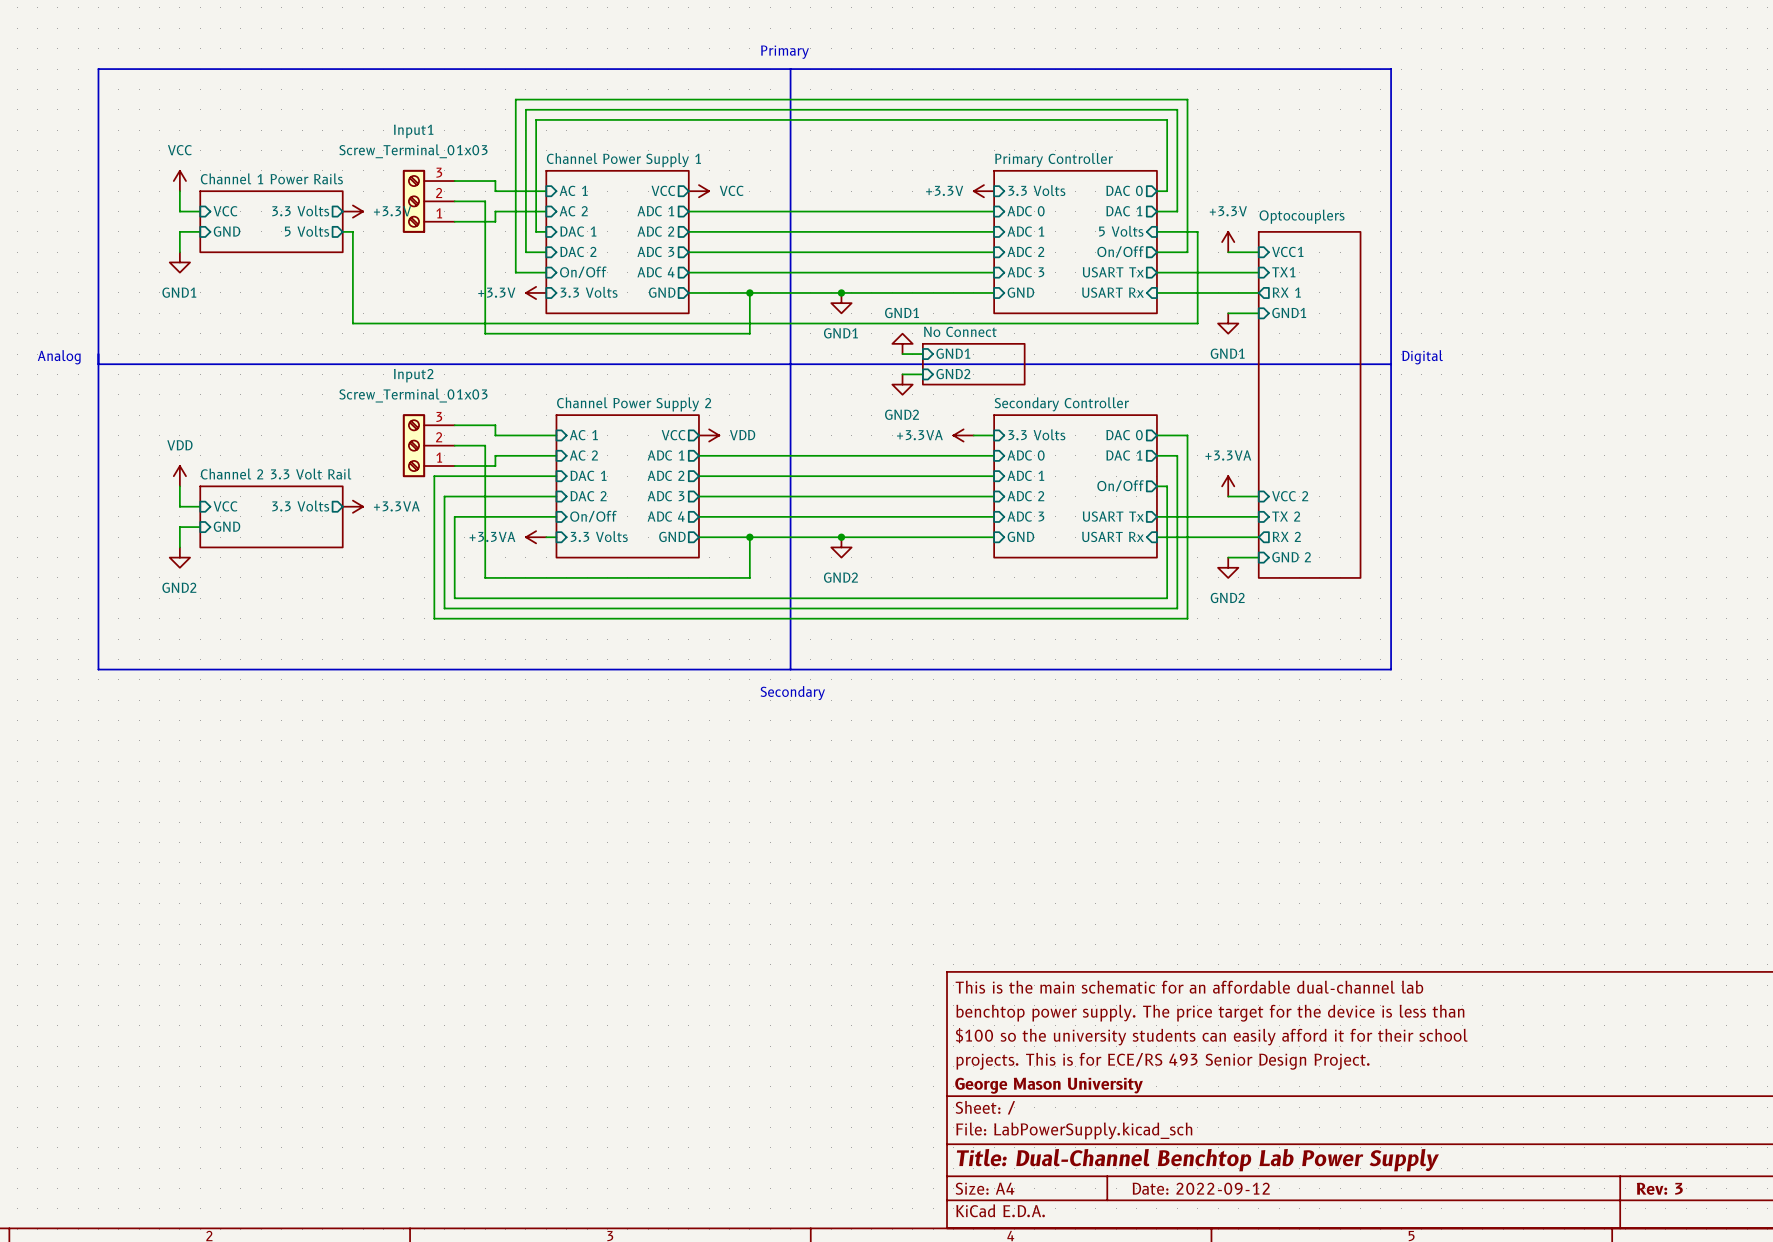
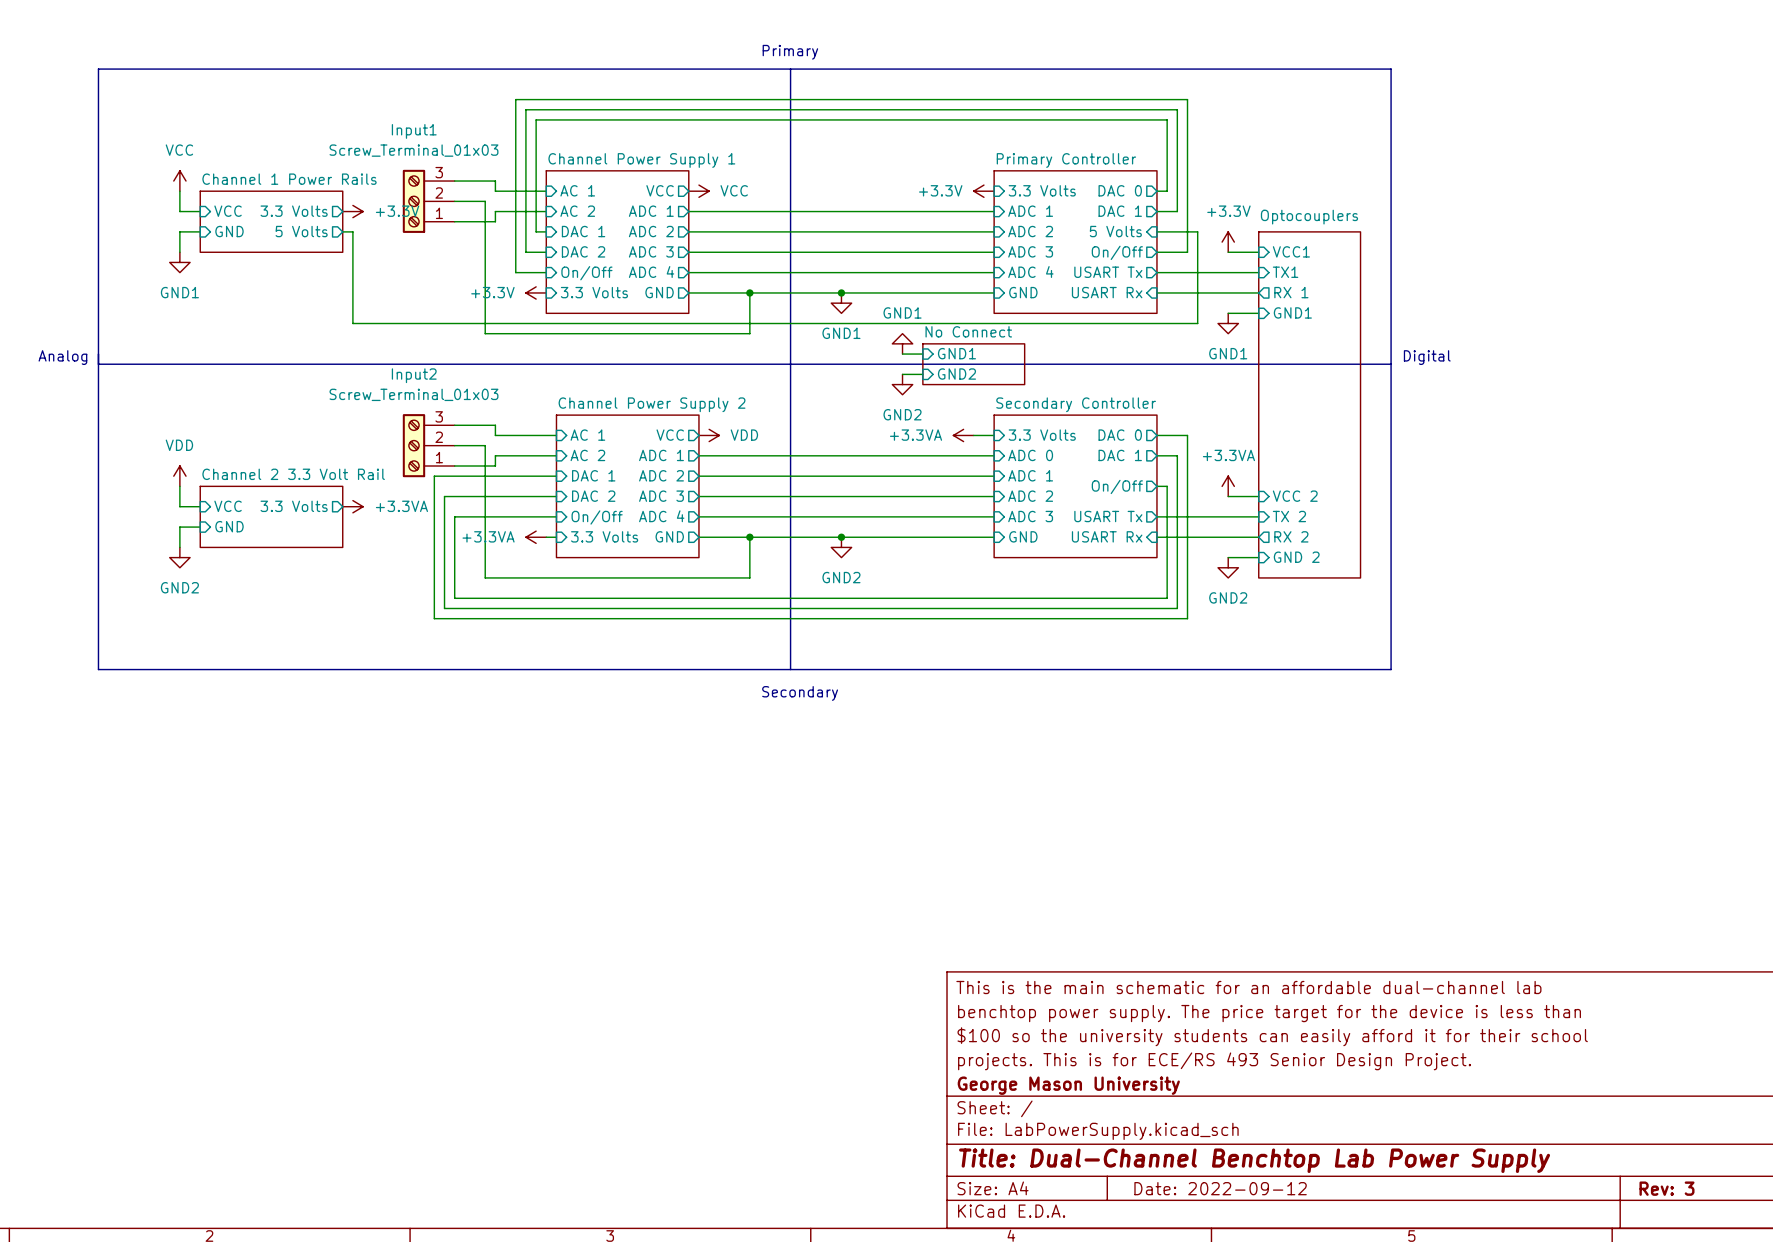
sheet pin: ADC 0 (1026, 211) -> ADC 1 (1030, 211)
sheet pin: ADC 1 (1025, 231) -> ADC 2 (1030, 231)
sheet pin: ADC 2 (1025, 251) -> ADC 3 (1030, 251)
sheet pin: ADC 3 (1025, 272) -> ADC 4 (1030, 272)

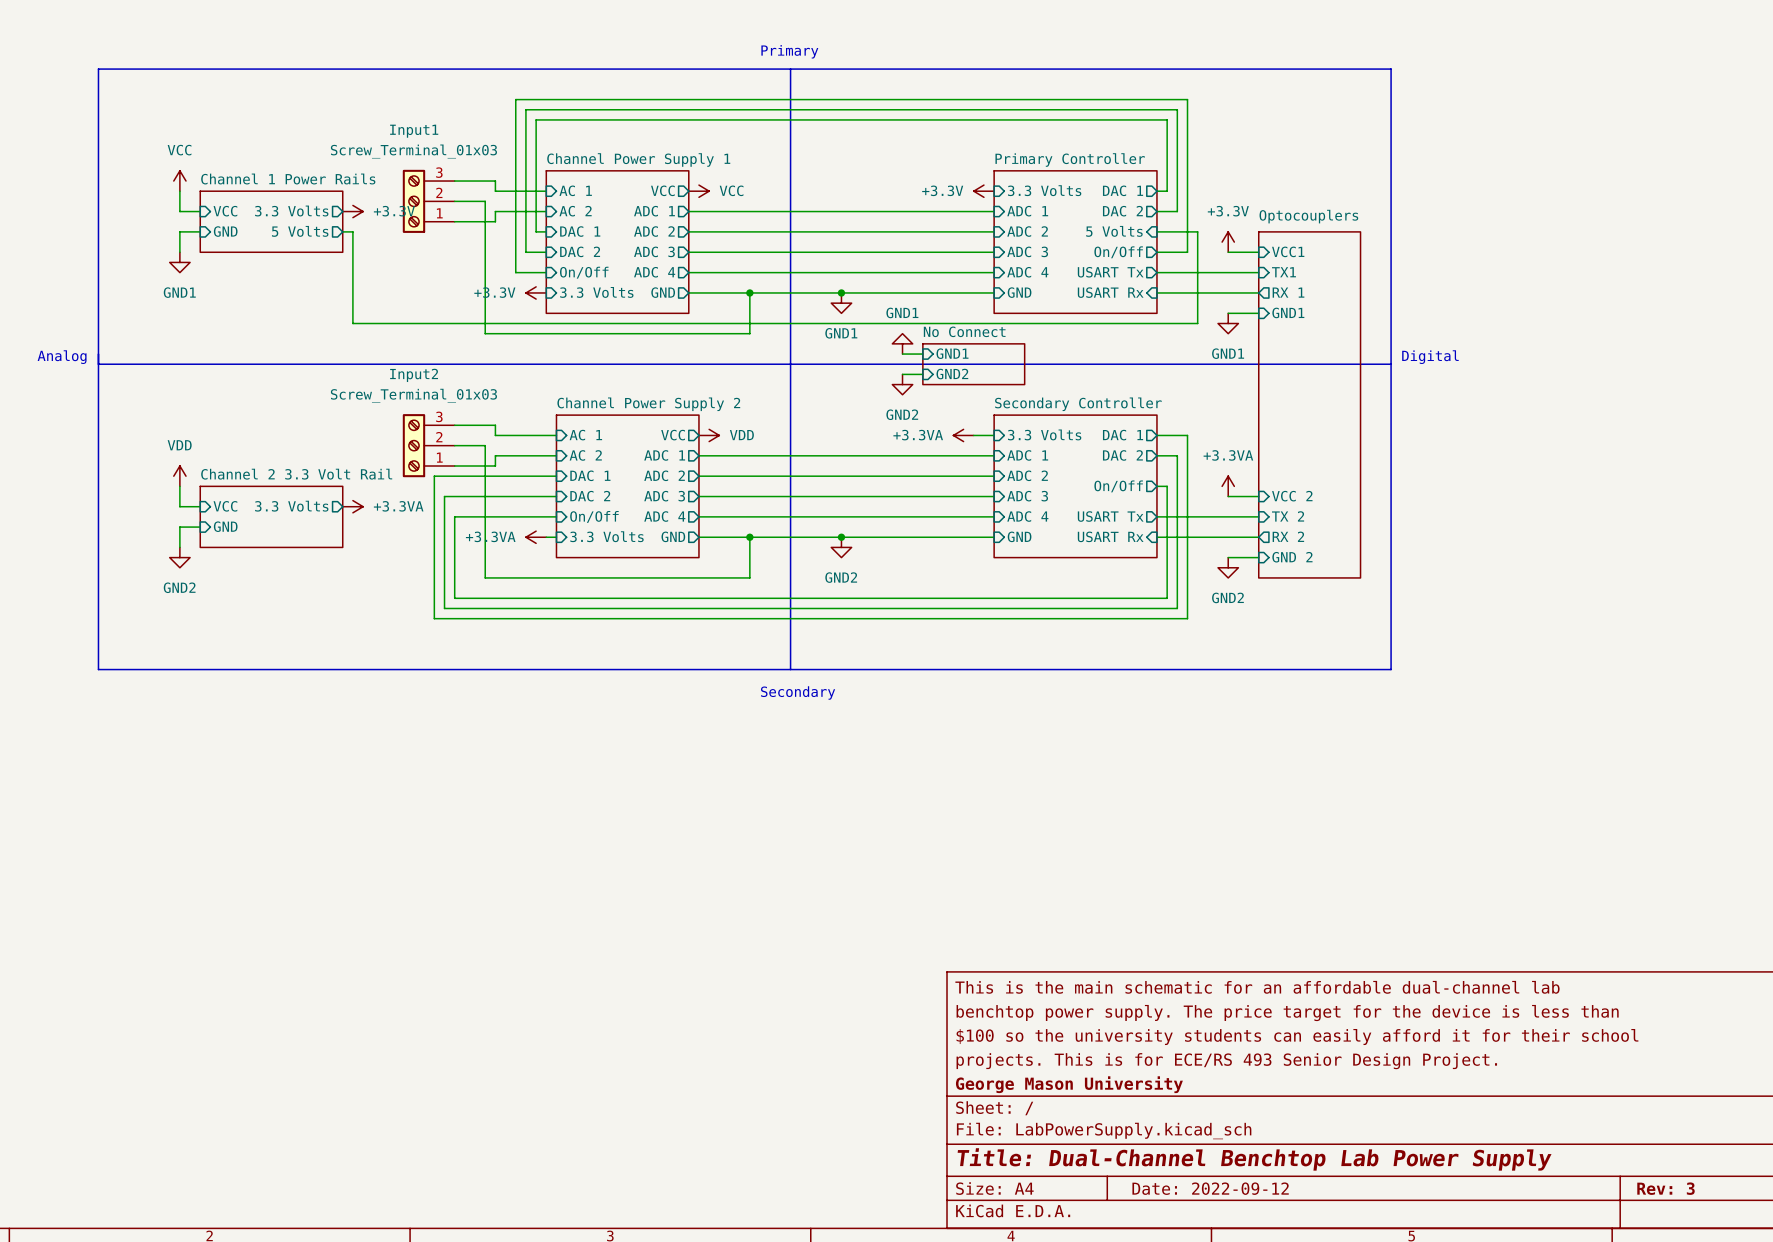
sheet pin: DAC 0 (1120, 190) -> DAC 1 (1123, 190)
sheet pin: DAC 1 (1120, 211) -> DAC 2 (1122, 211)
sheet pin: DAC 0 (1120, 435) -> DAC 1 (1123, 435)
sheet pin: ADC 0 (1030, 455) -> ADC 1 (1027, 455)
sheet pin: DAC 1 (1120, 455) -> DAC 2 (1122, 455)
sheet pin: ADC 1 (1030, 475) -> ADC 2 (1027, 475)
sheet pin: ADC 2 (1030, 496) -> ADC 3 (1027, 496)
sheet pin: ADC 3 (1030, 516) -> ADC 4 (1027, 516)

